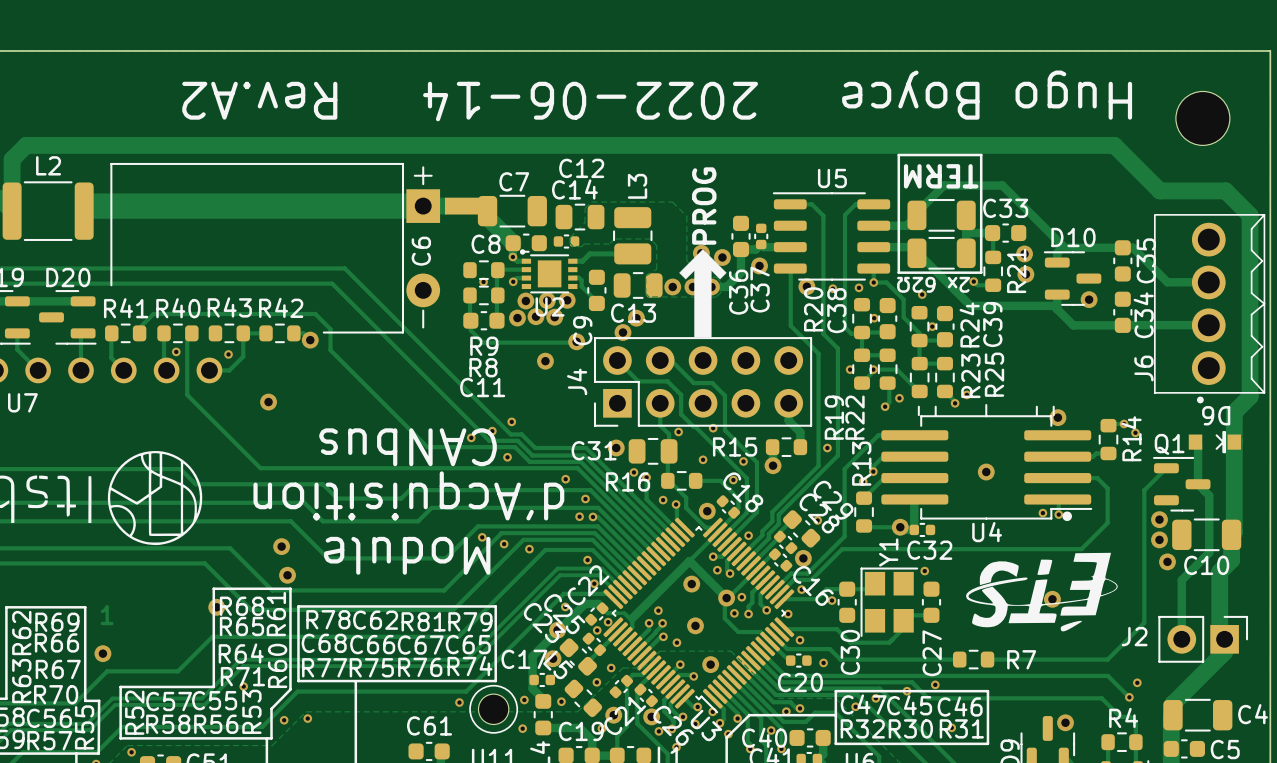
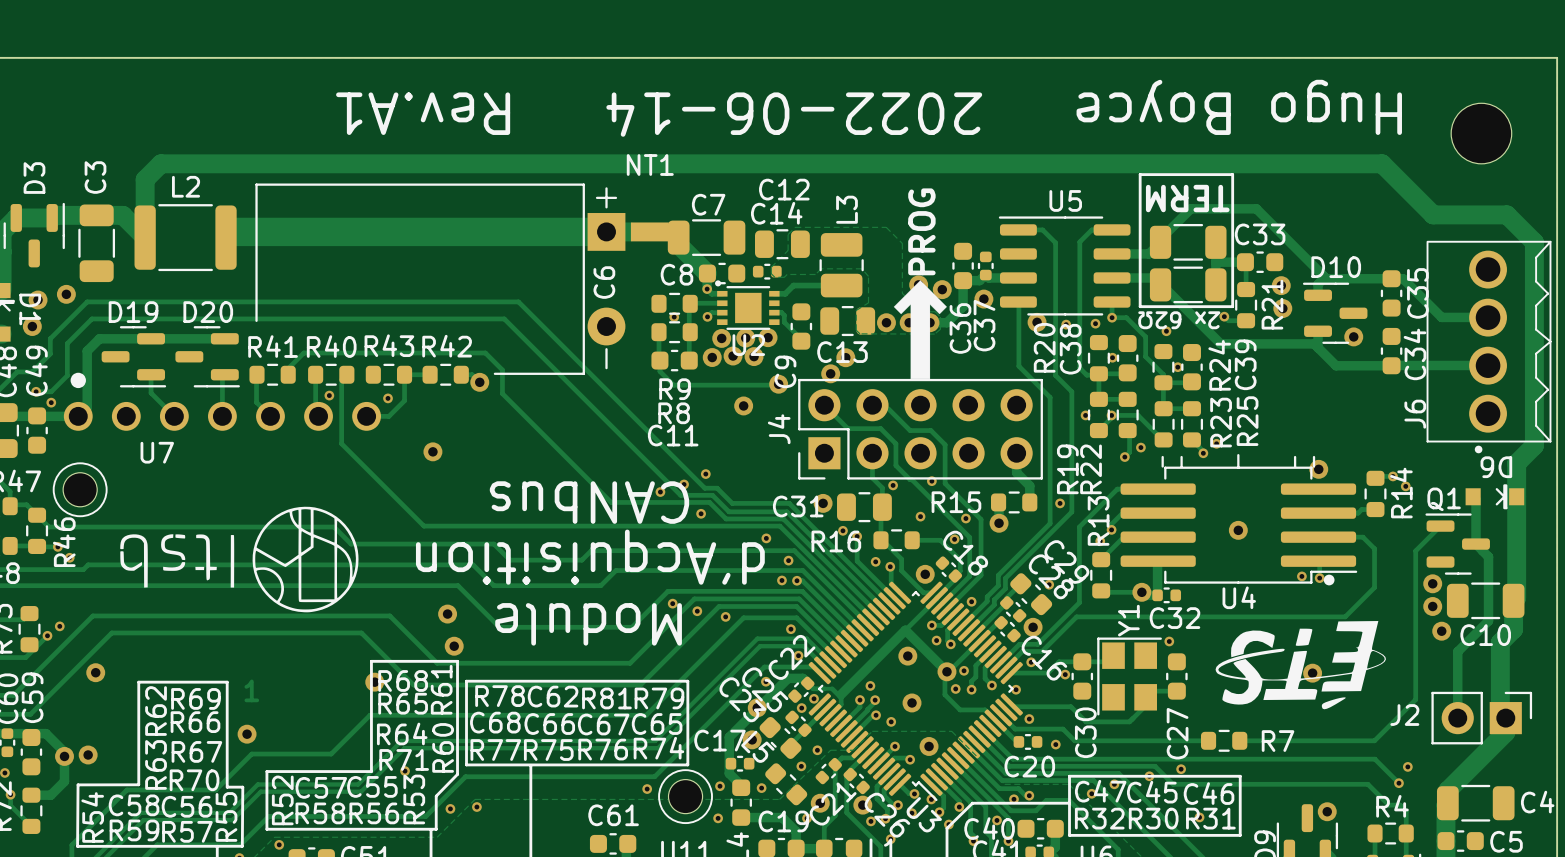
text: Hugo Boyce 2022-06-14 Rev.A2 (657, 95) -> Hugo Boyce 2022-06-14 Rev.A1 (869, 108)
NT1 name: none -> NT1 (650, 165)

